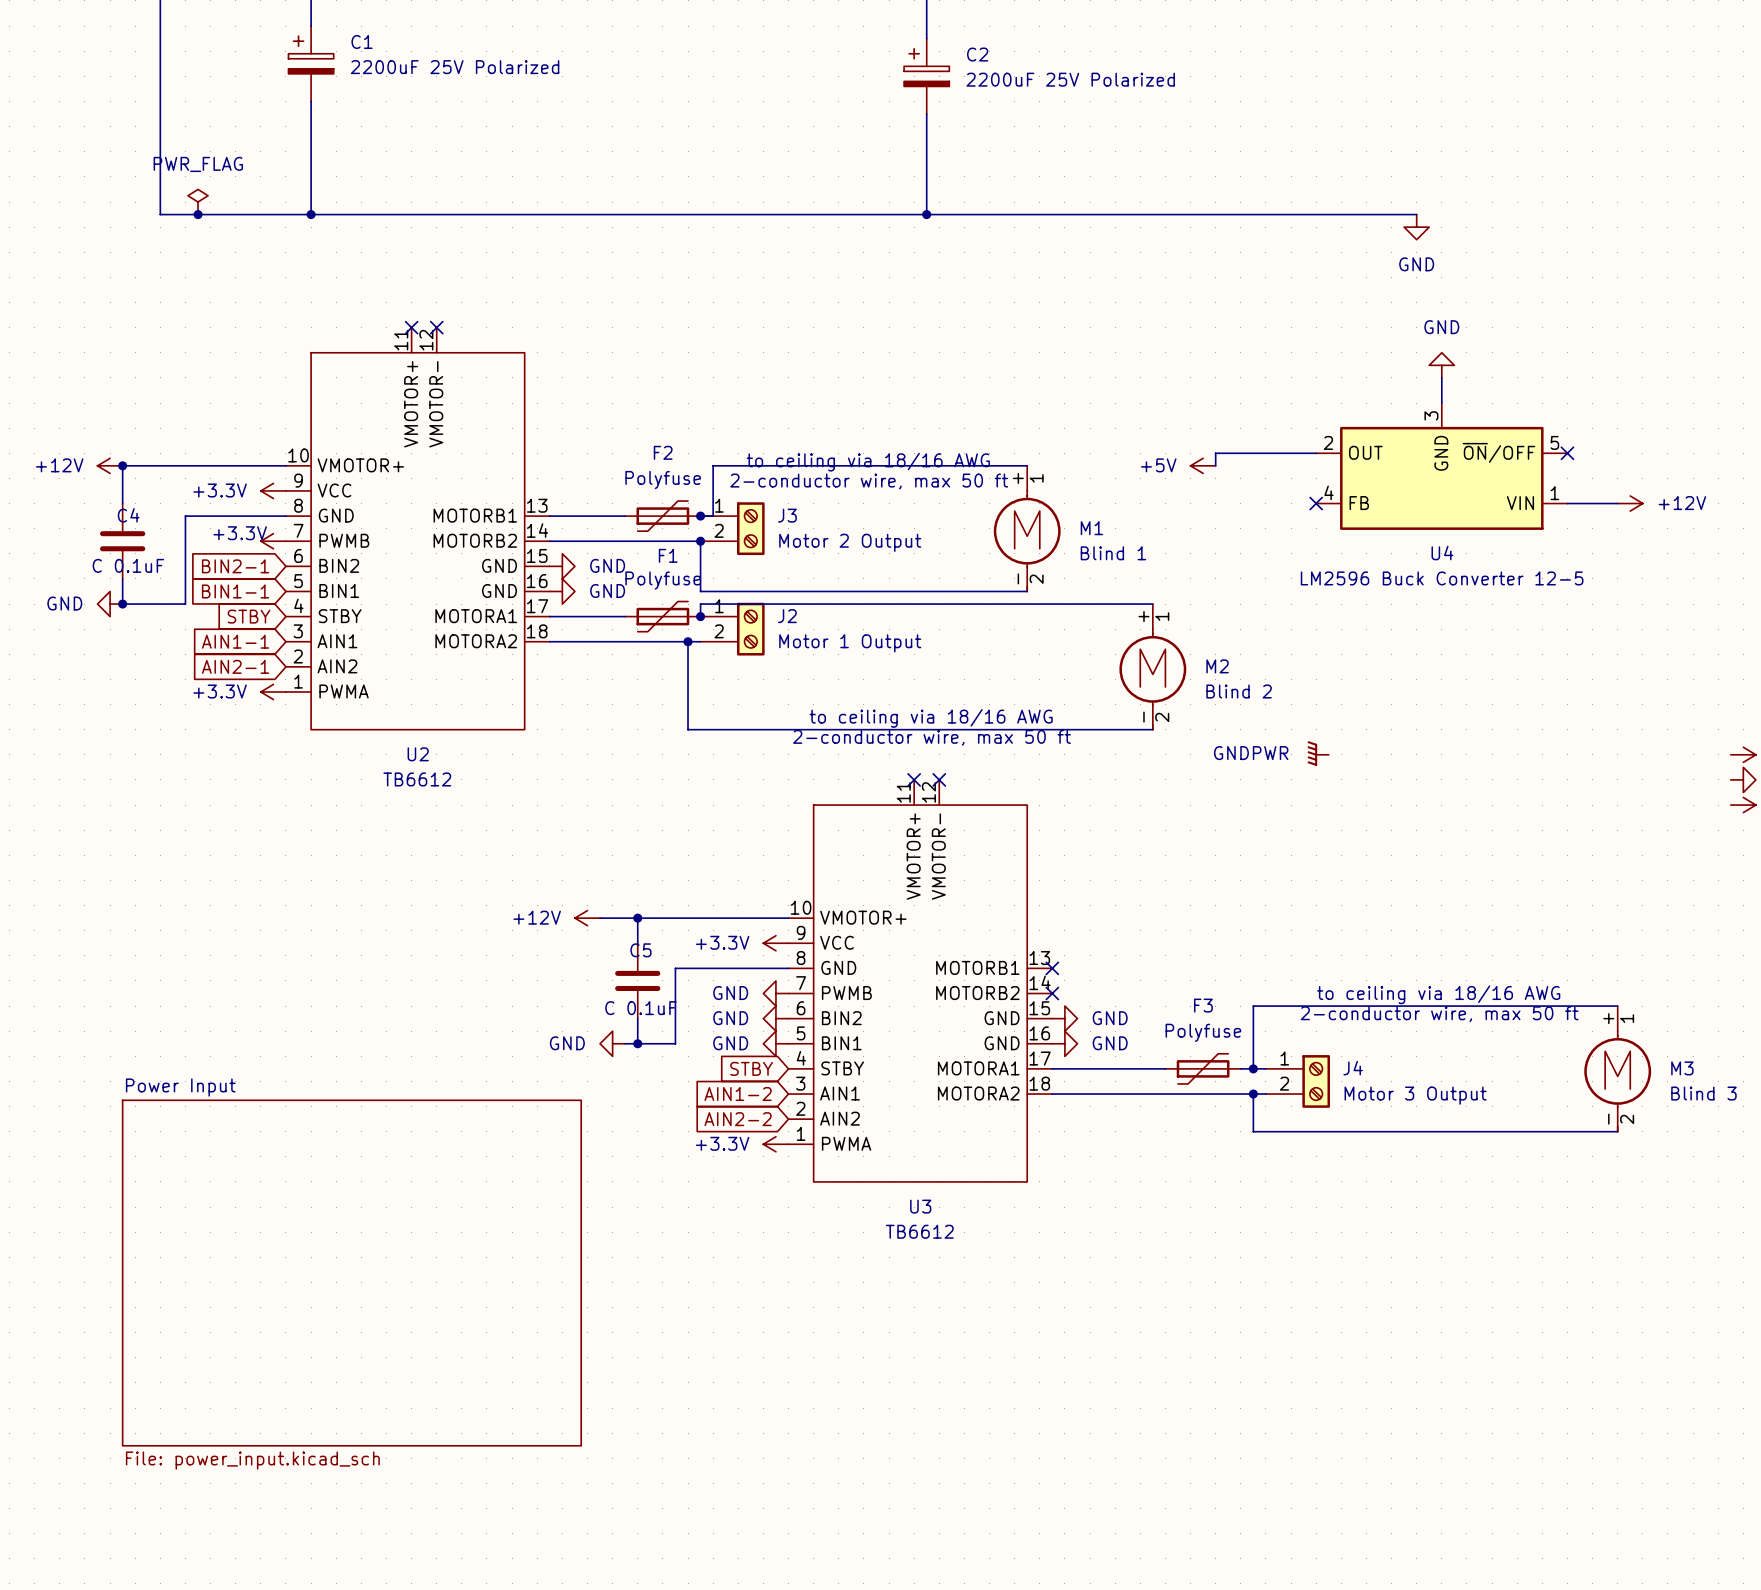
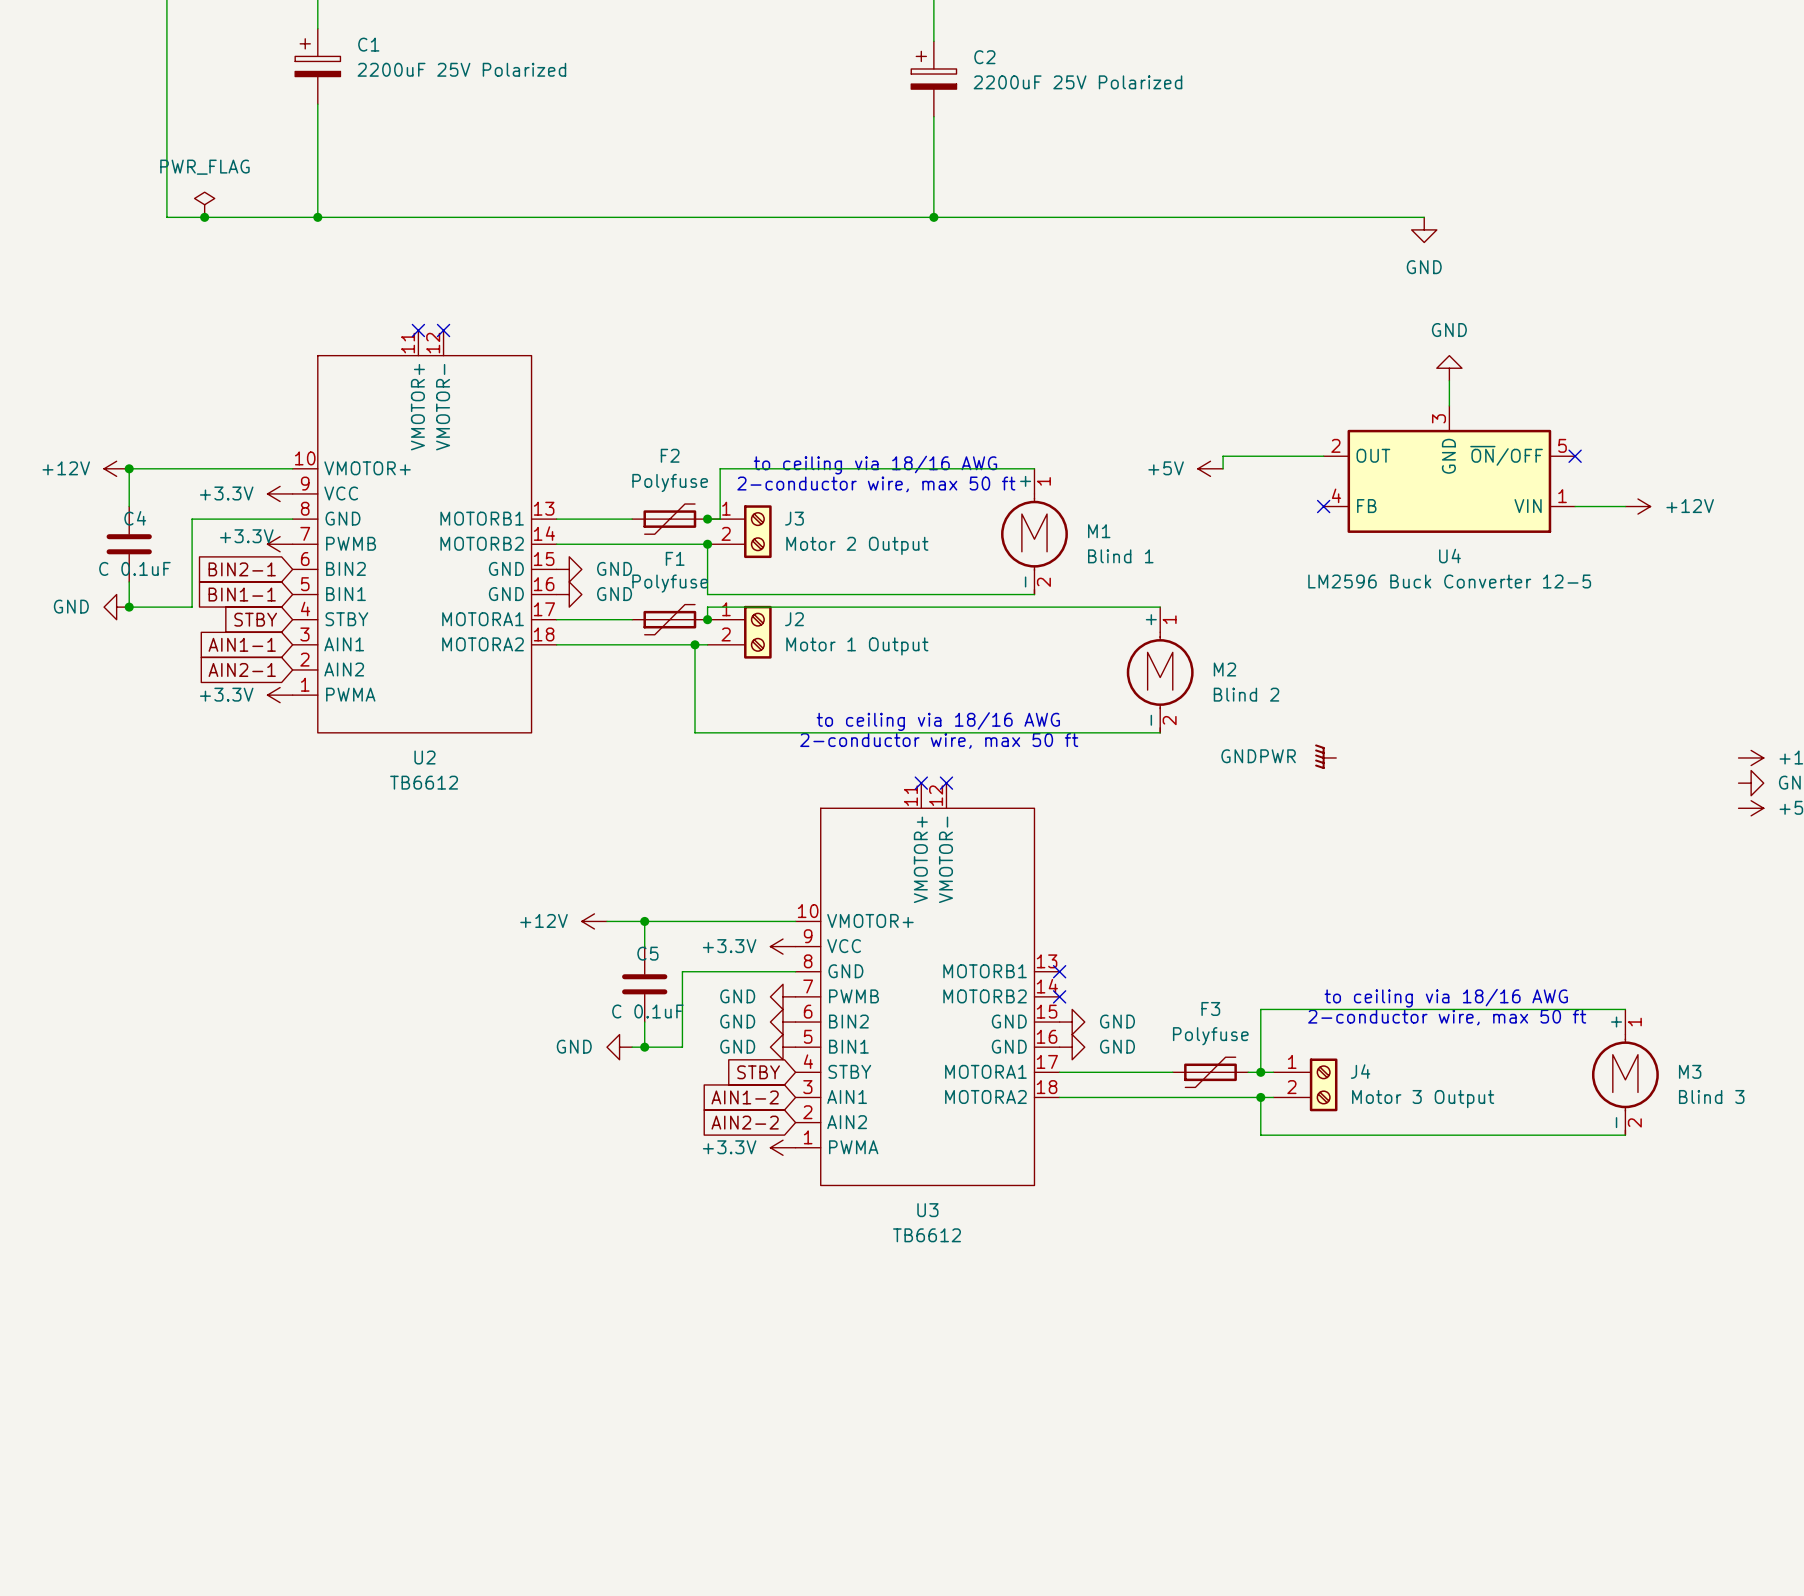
sheet Power Input: File: power_input.kicad_sch (351, 1273) -> none

